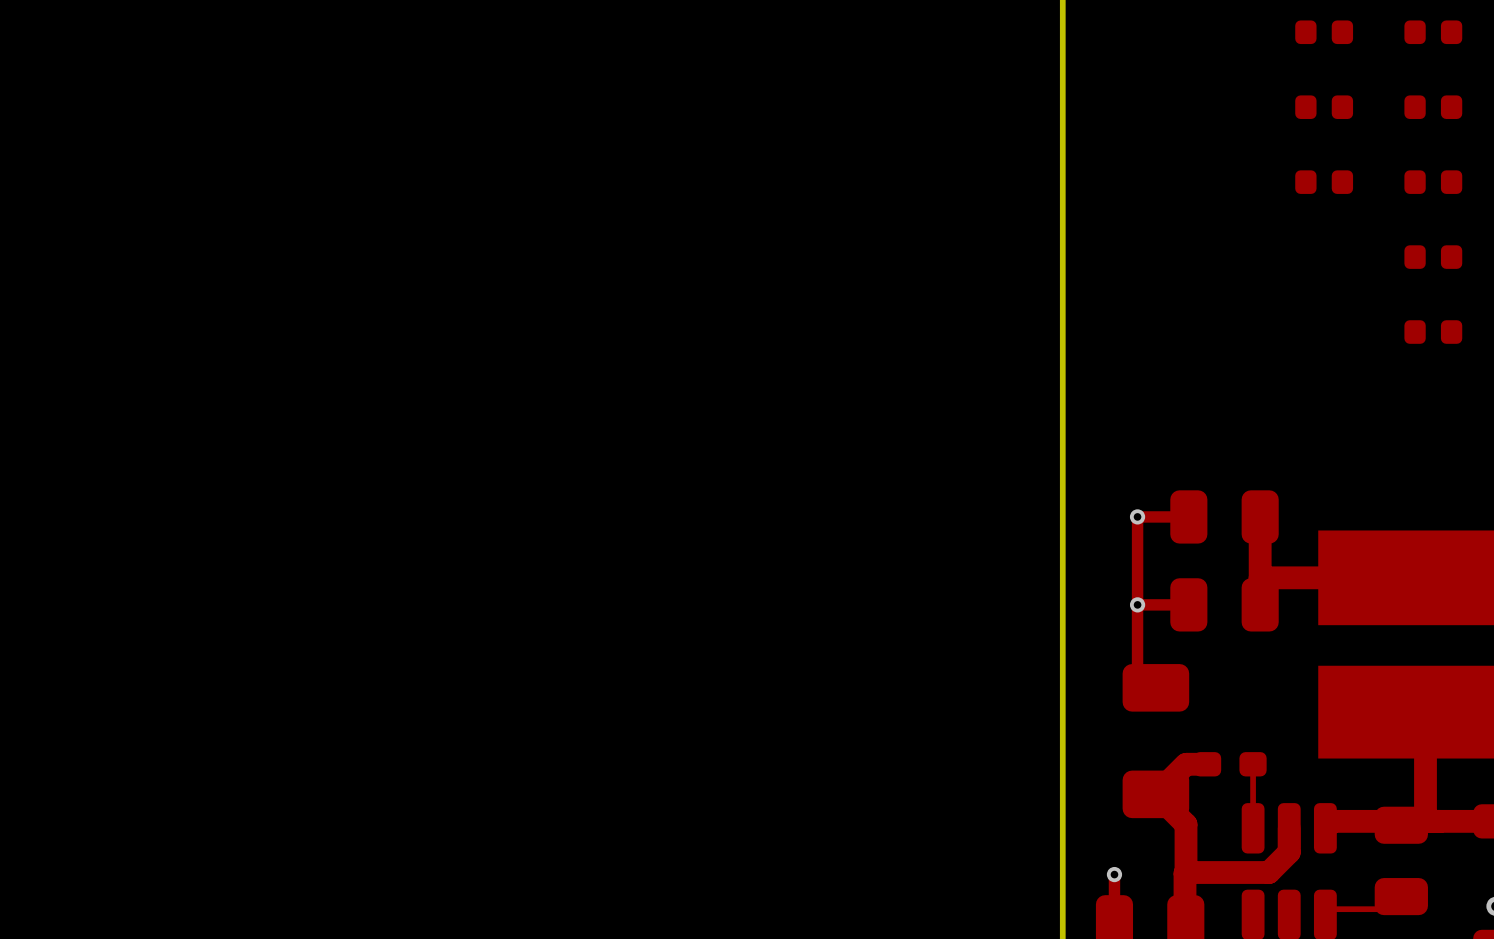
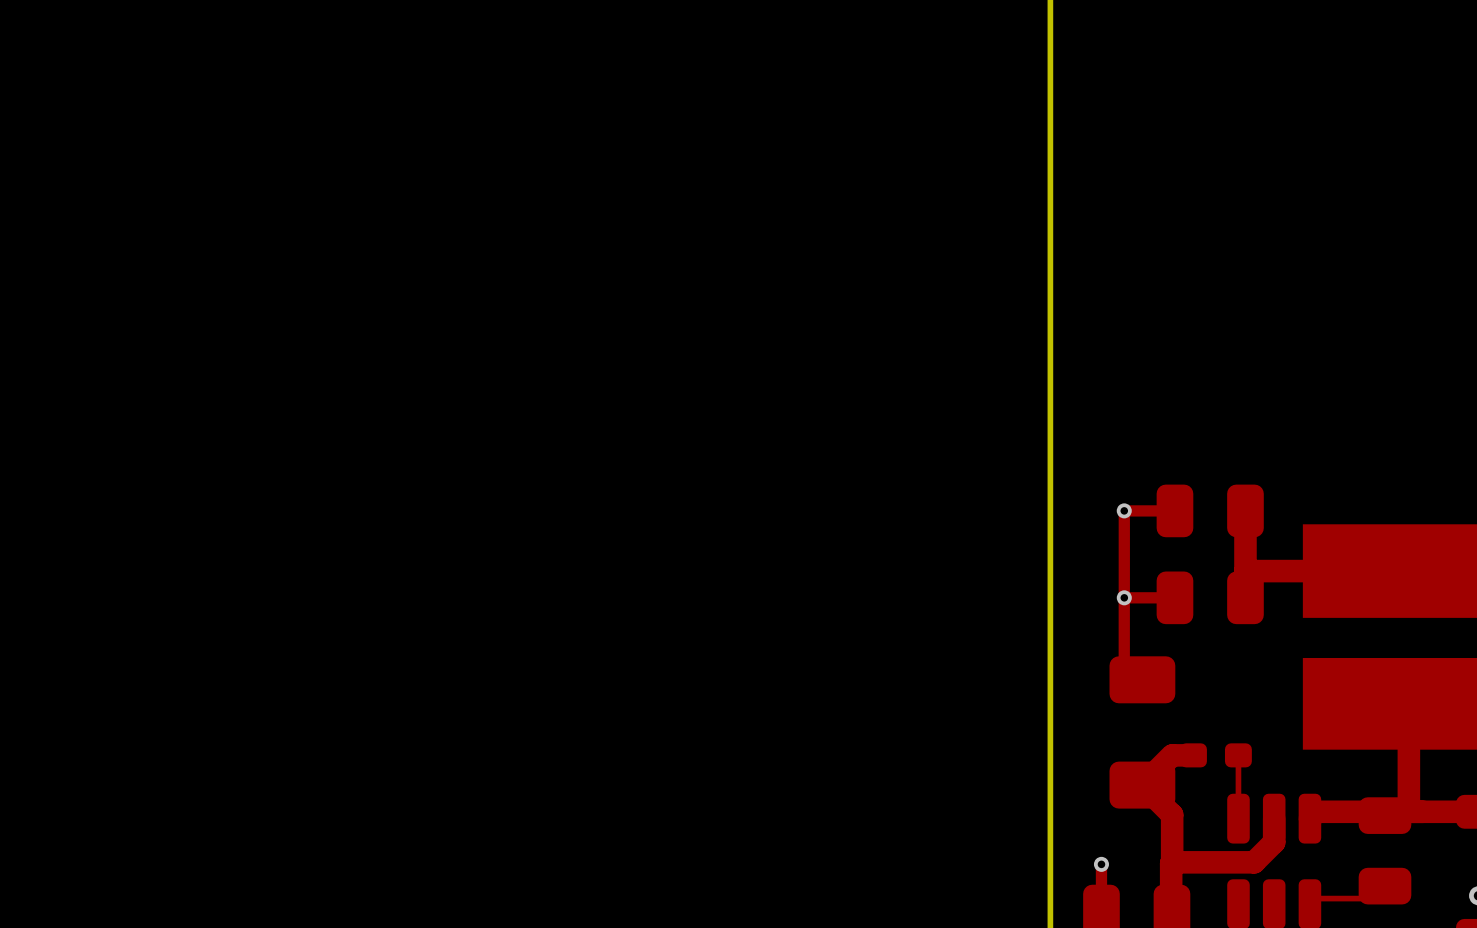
part: (1324, 32) -> none
part: (1433, 32) -> none
part: (1324, 107) -> none
part: (1433, 107) -> none
part: (1324, 182) -> none
part: (1433, 182) -> none
part: (1433, 257) -> none
part: (1433, 332) -> none

